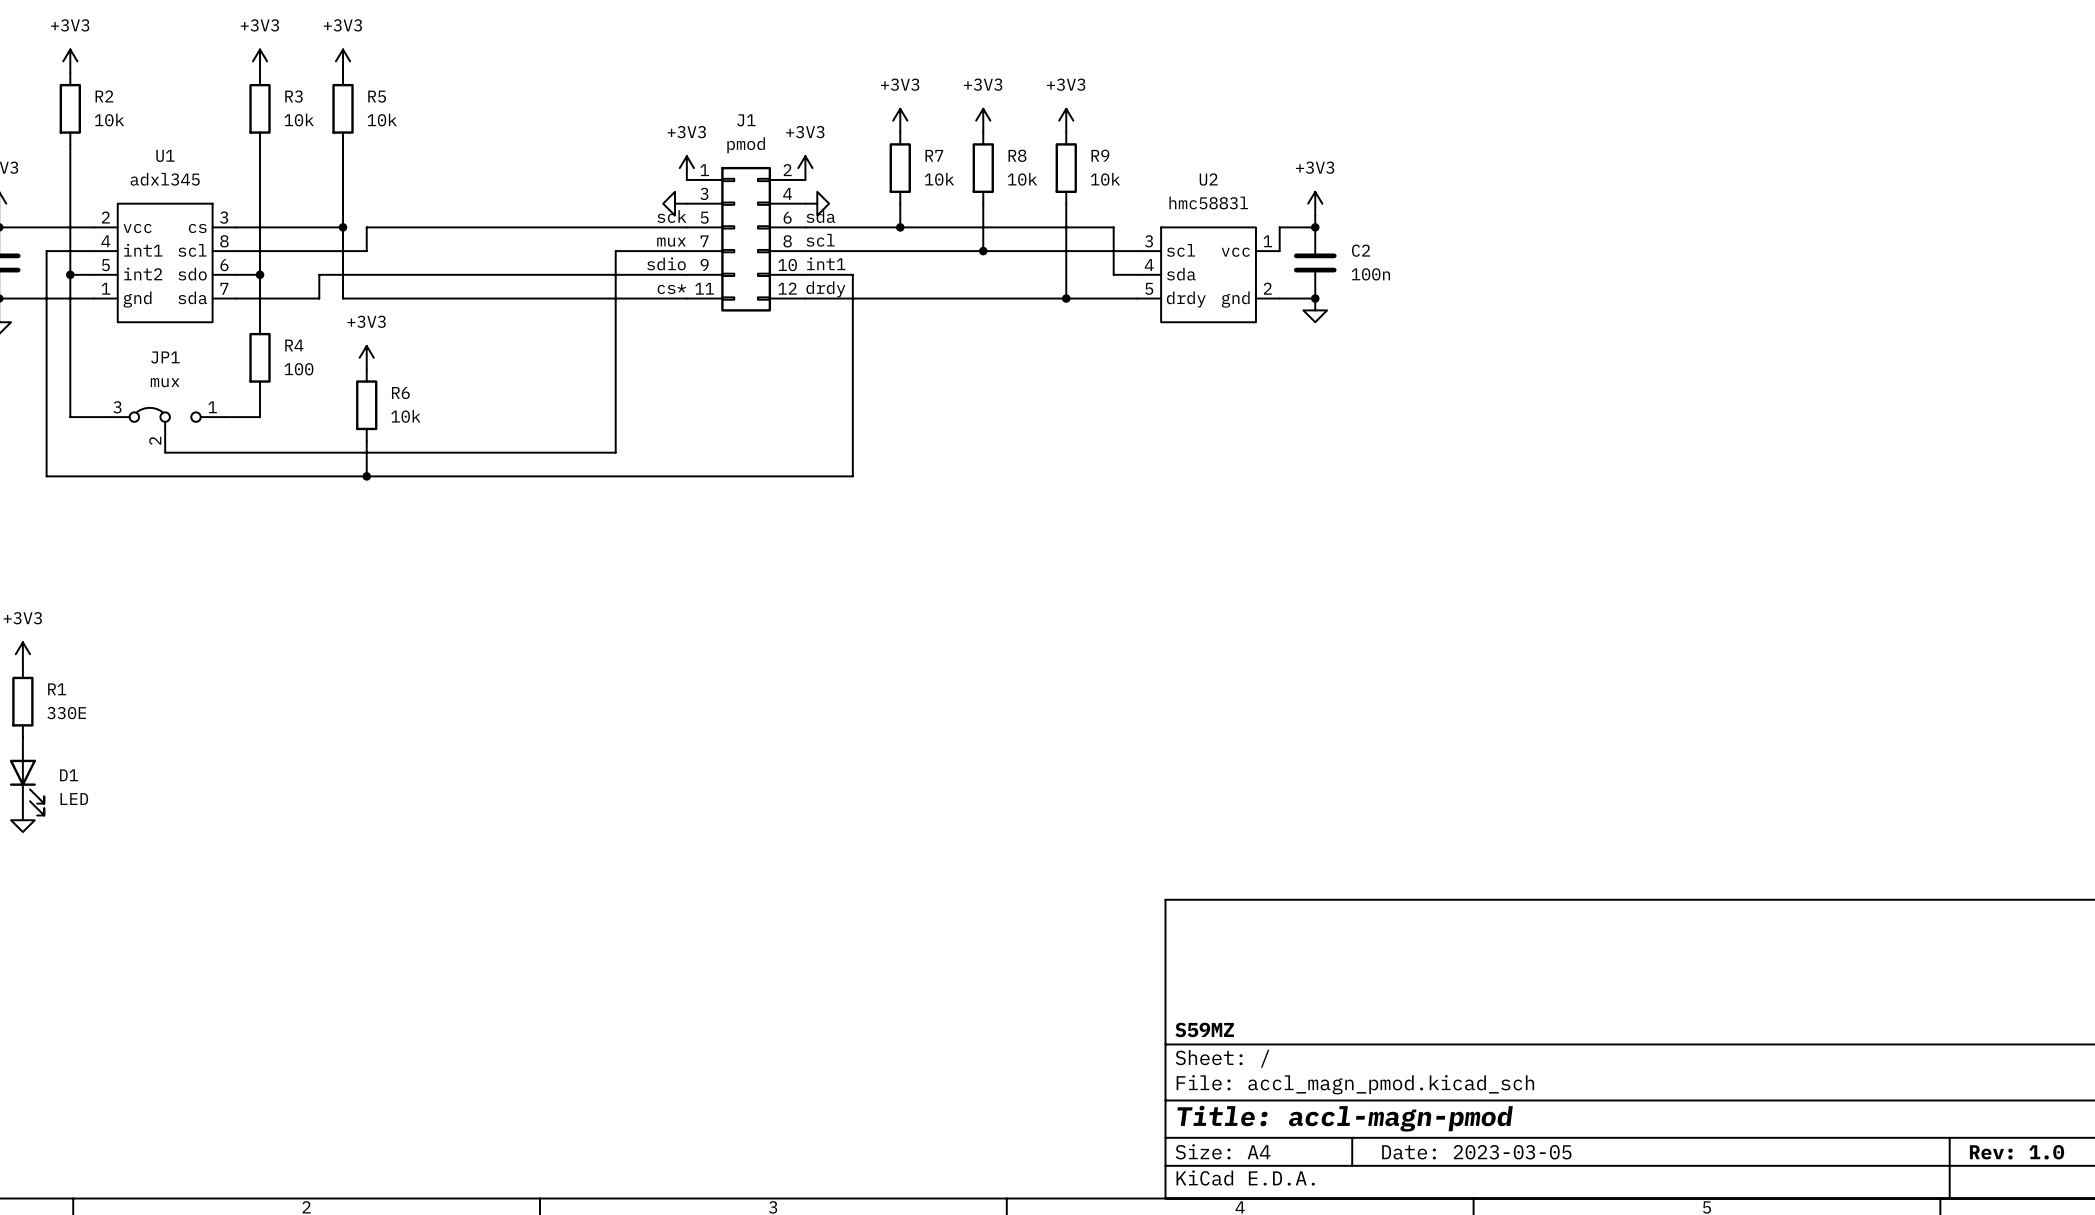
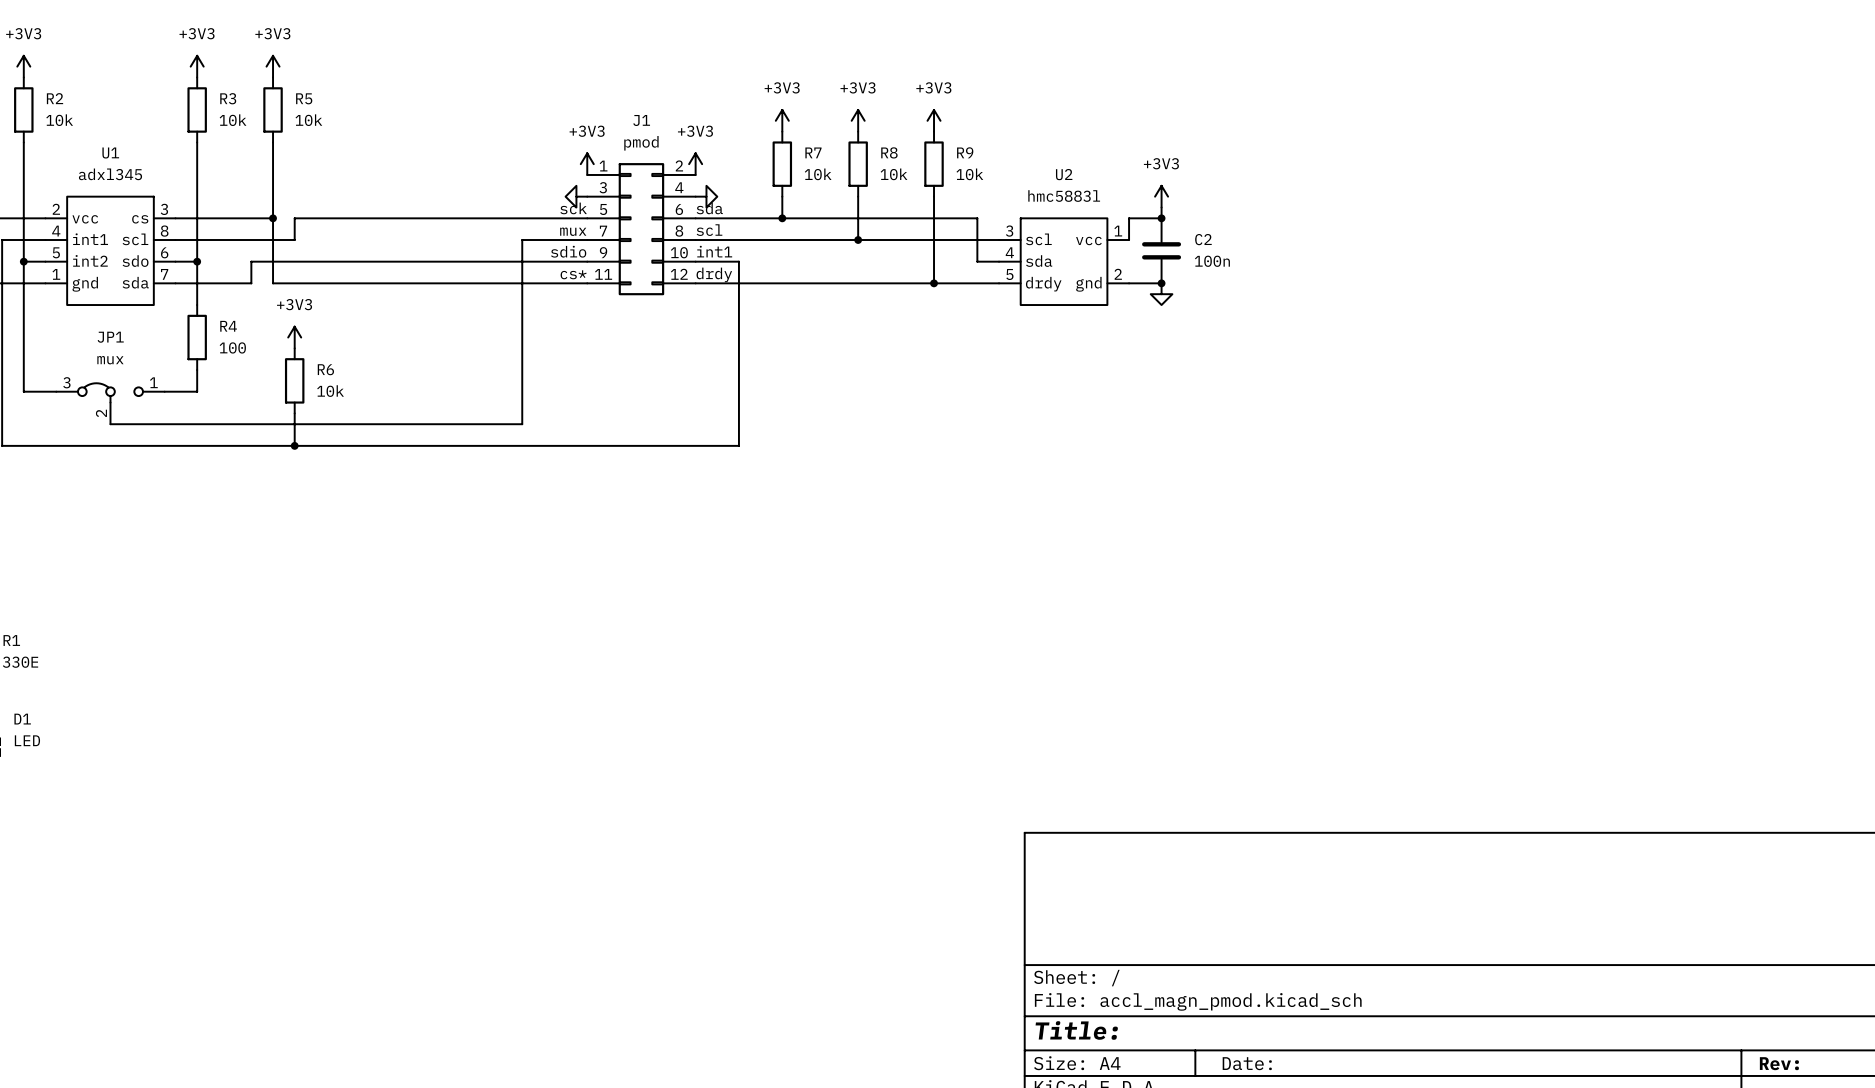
title block: S59MZ (1204, 1029) -> none
title block: Title: accl-magn-pmod (1345, 1118) -> Title: (1076, 1030)
title block: Date: 2023-03-05 (1476, 1152) -> Date: (1247, 1063)
title block: Rev: 1.0 (2017, 1152) -> Rev: (1779, 1063)

